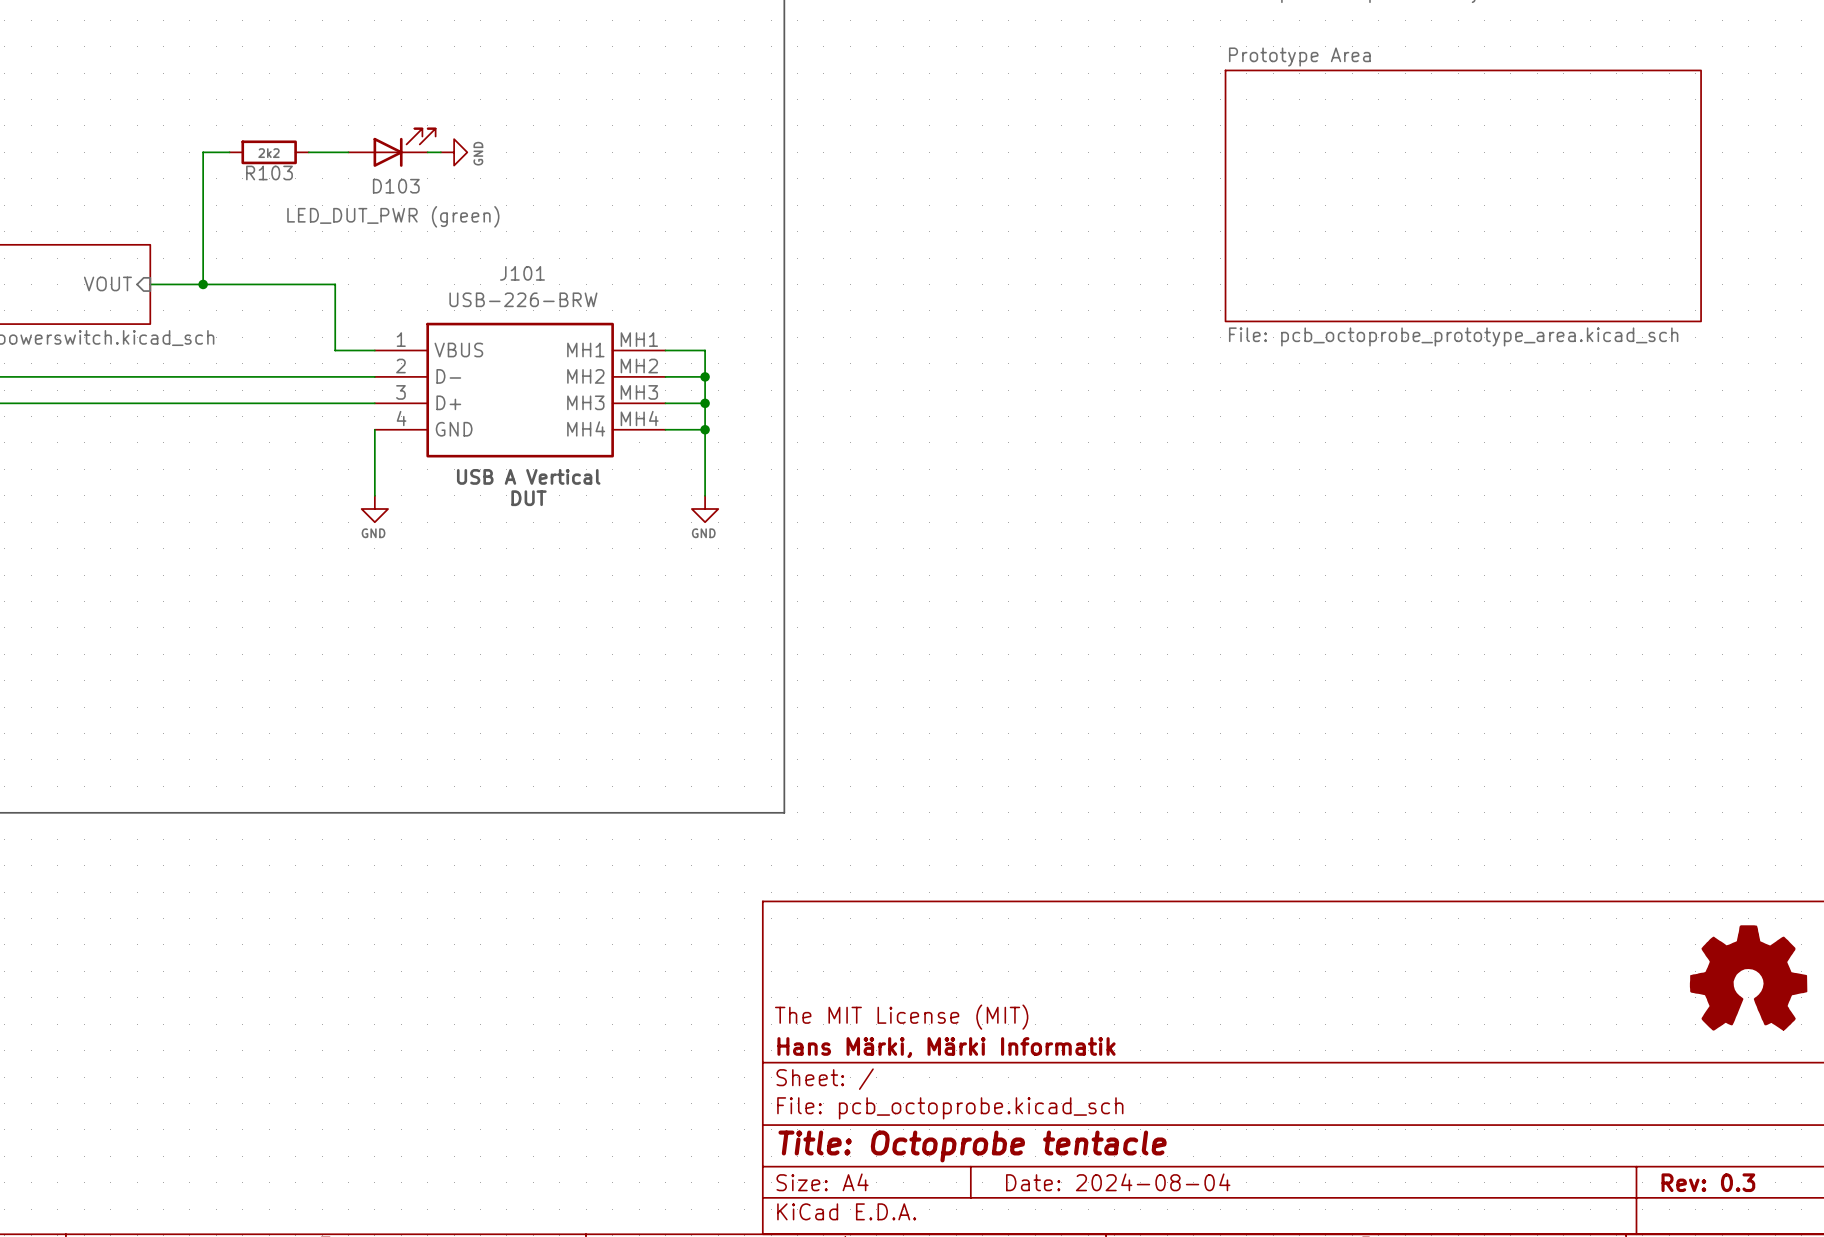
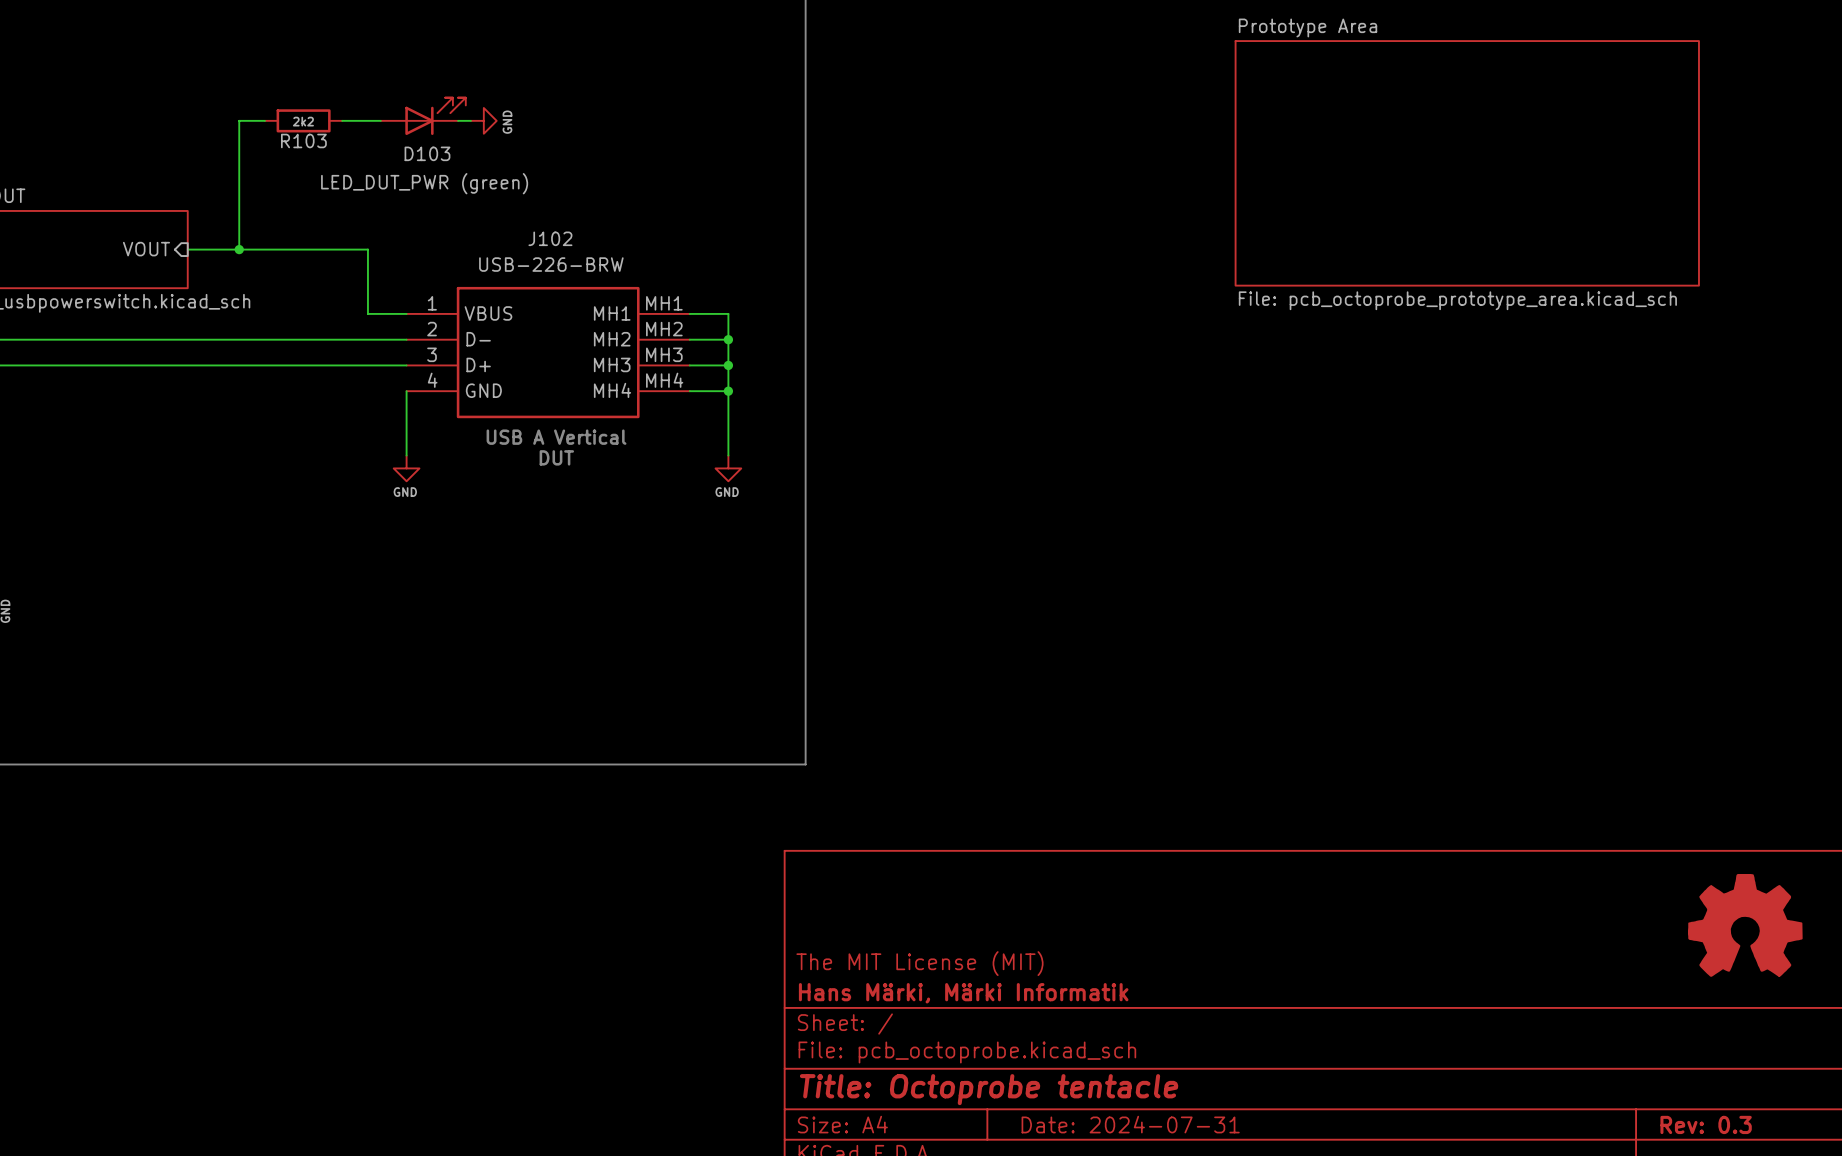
J101 name: J101 (522, 273) -> J102 (550, 238)
title block: Date: 2024-08-04 (1118, 1182) -> Date: 2024-07-31 (1130, 1124)

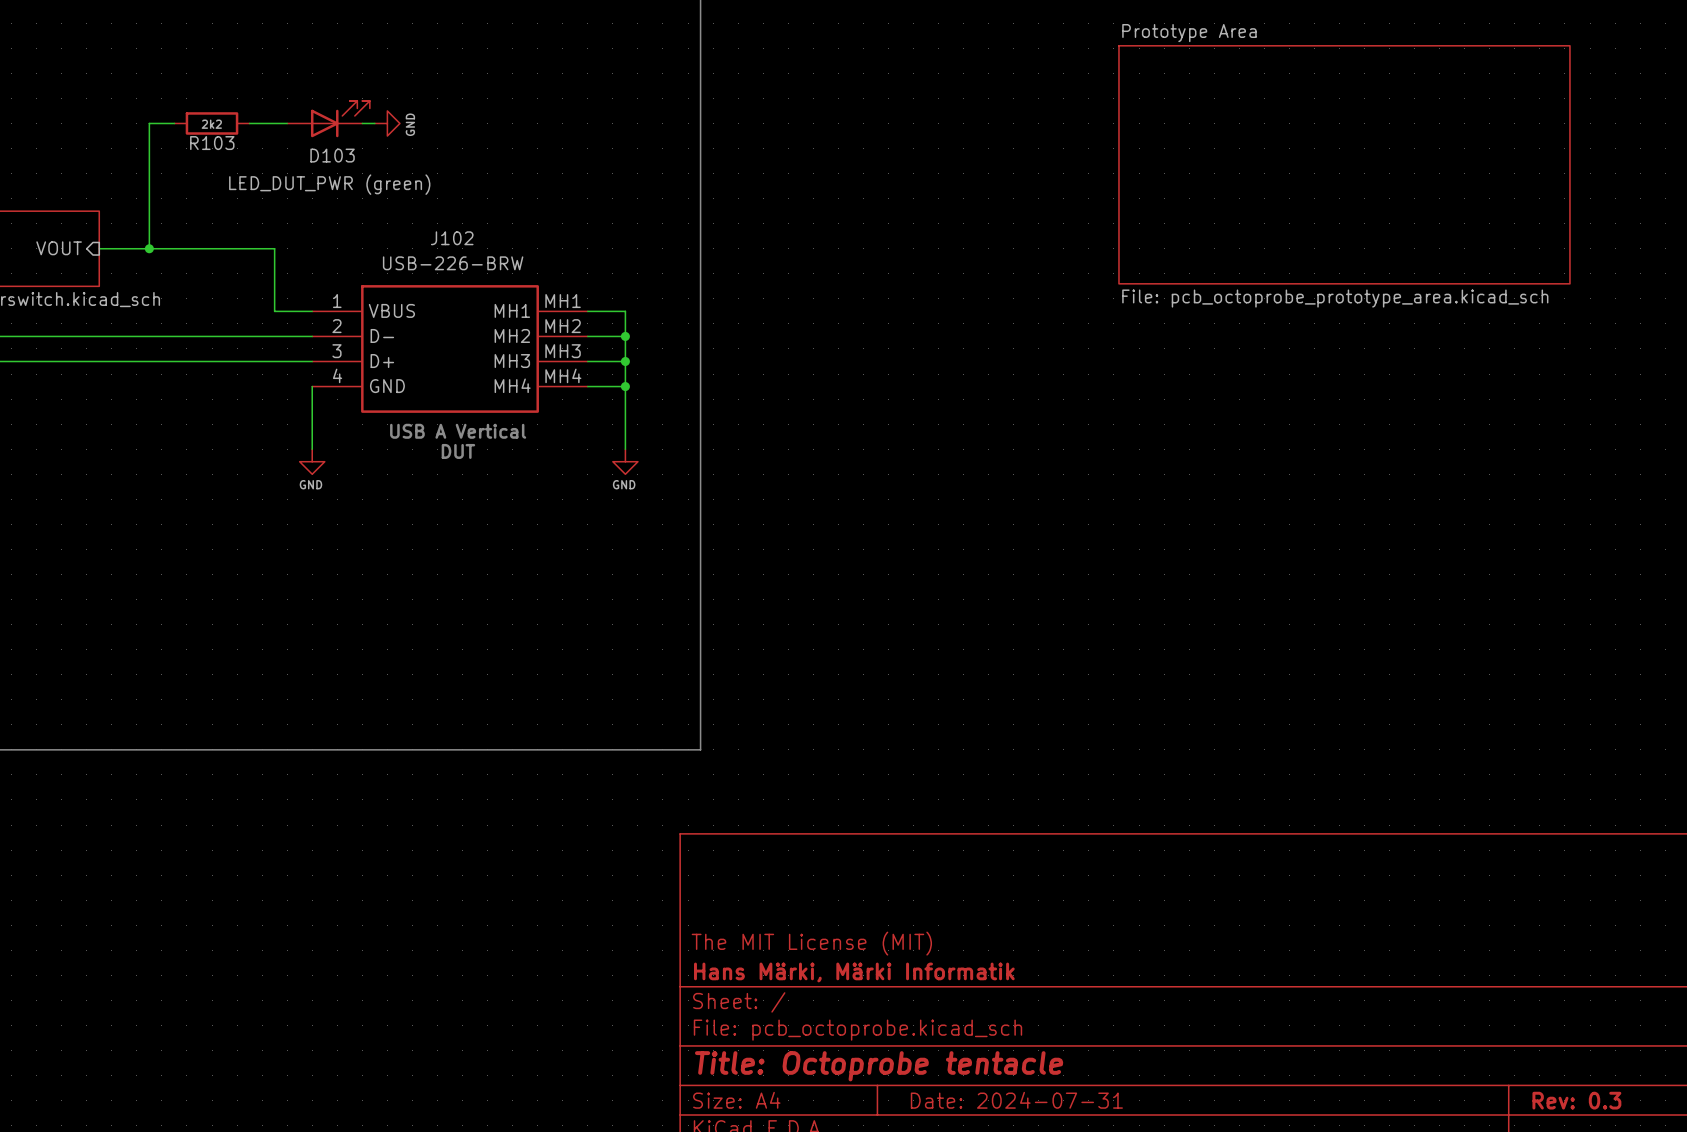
power symbol: (1745, 925) -> none

